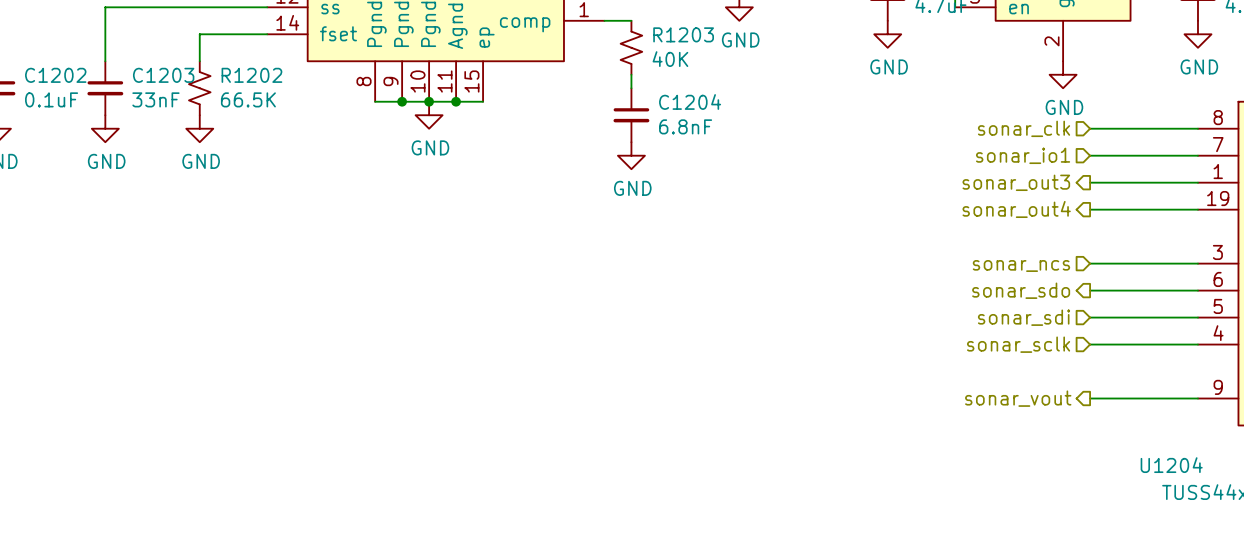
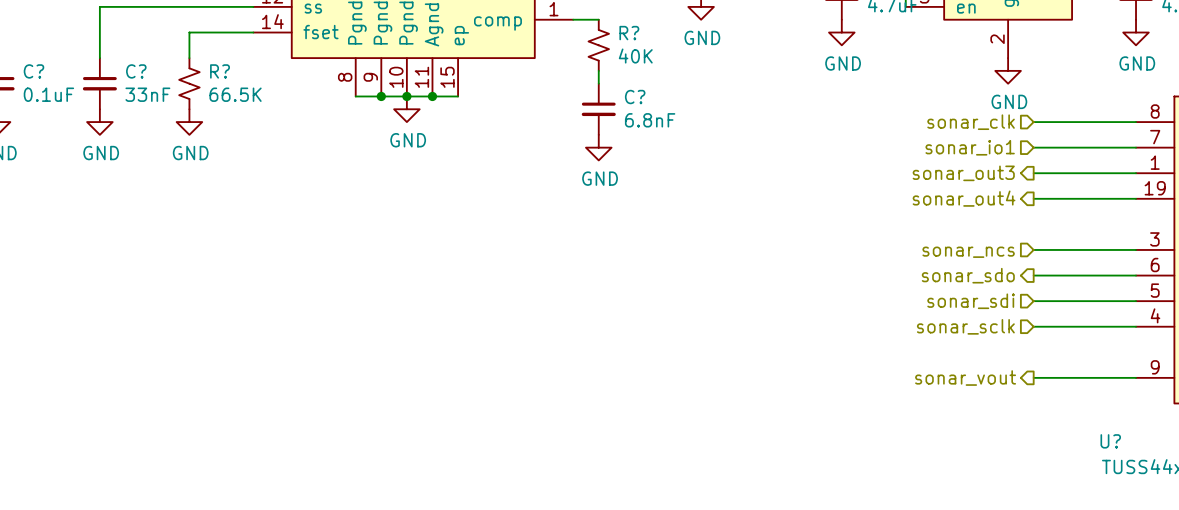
R1203 name: R1203 (683, 34) -> R? (629, 33)
C1202 name: C1202 (55, 75) -> C? (33, 71)
C1203 name: C1203 (163, 75) -> C? (136, 71)
R1202 name: R1202 (251, 75) -> R? (220, 71)
C1204 name: C1204 (690, 101) -> C? (635, 97)
U1204 name: U1204 (1171, 465) -> U? (1110, 441)

